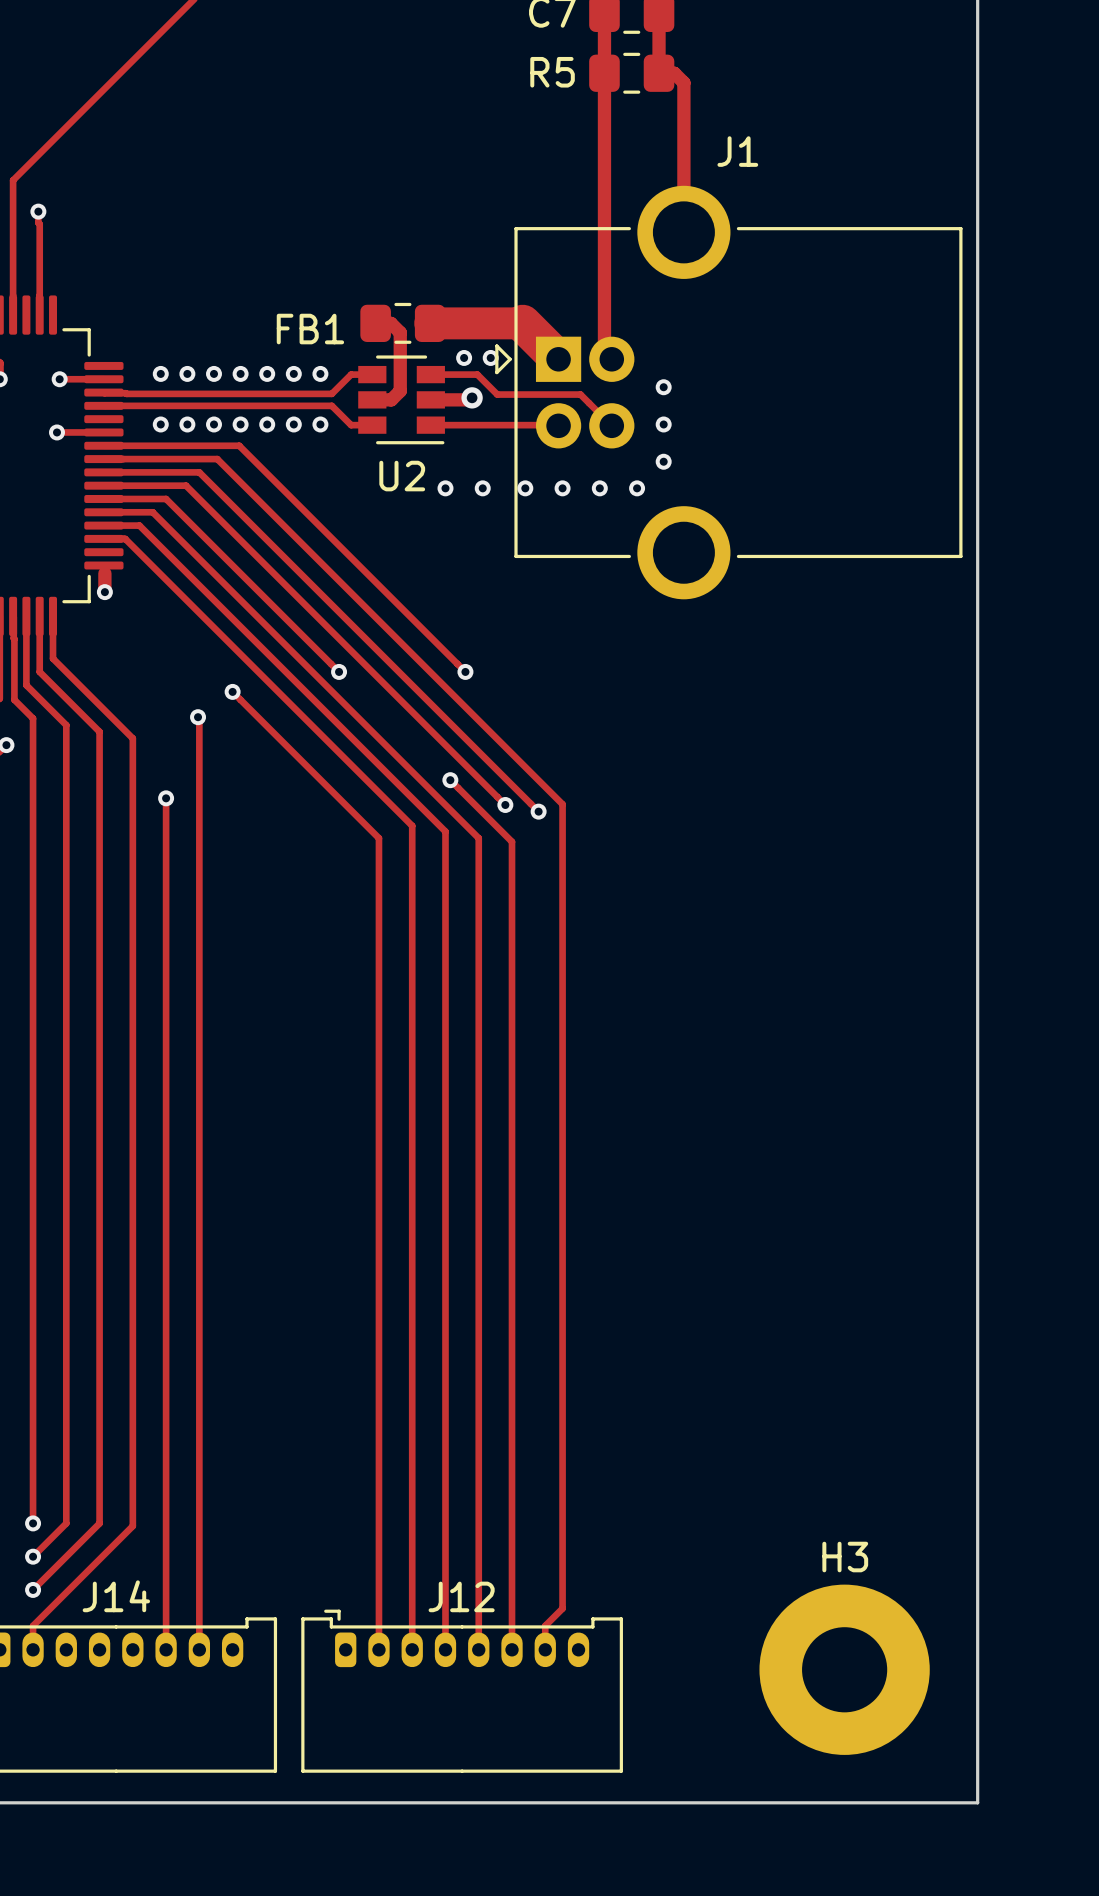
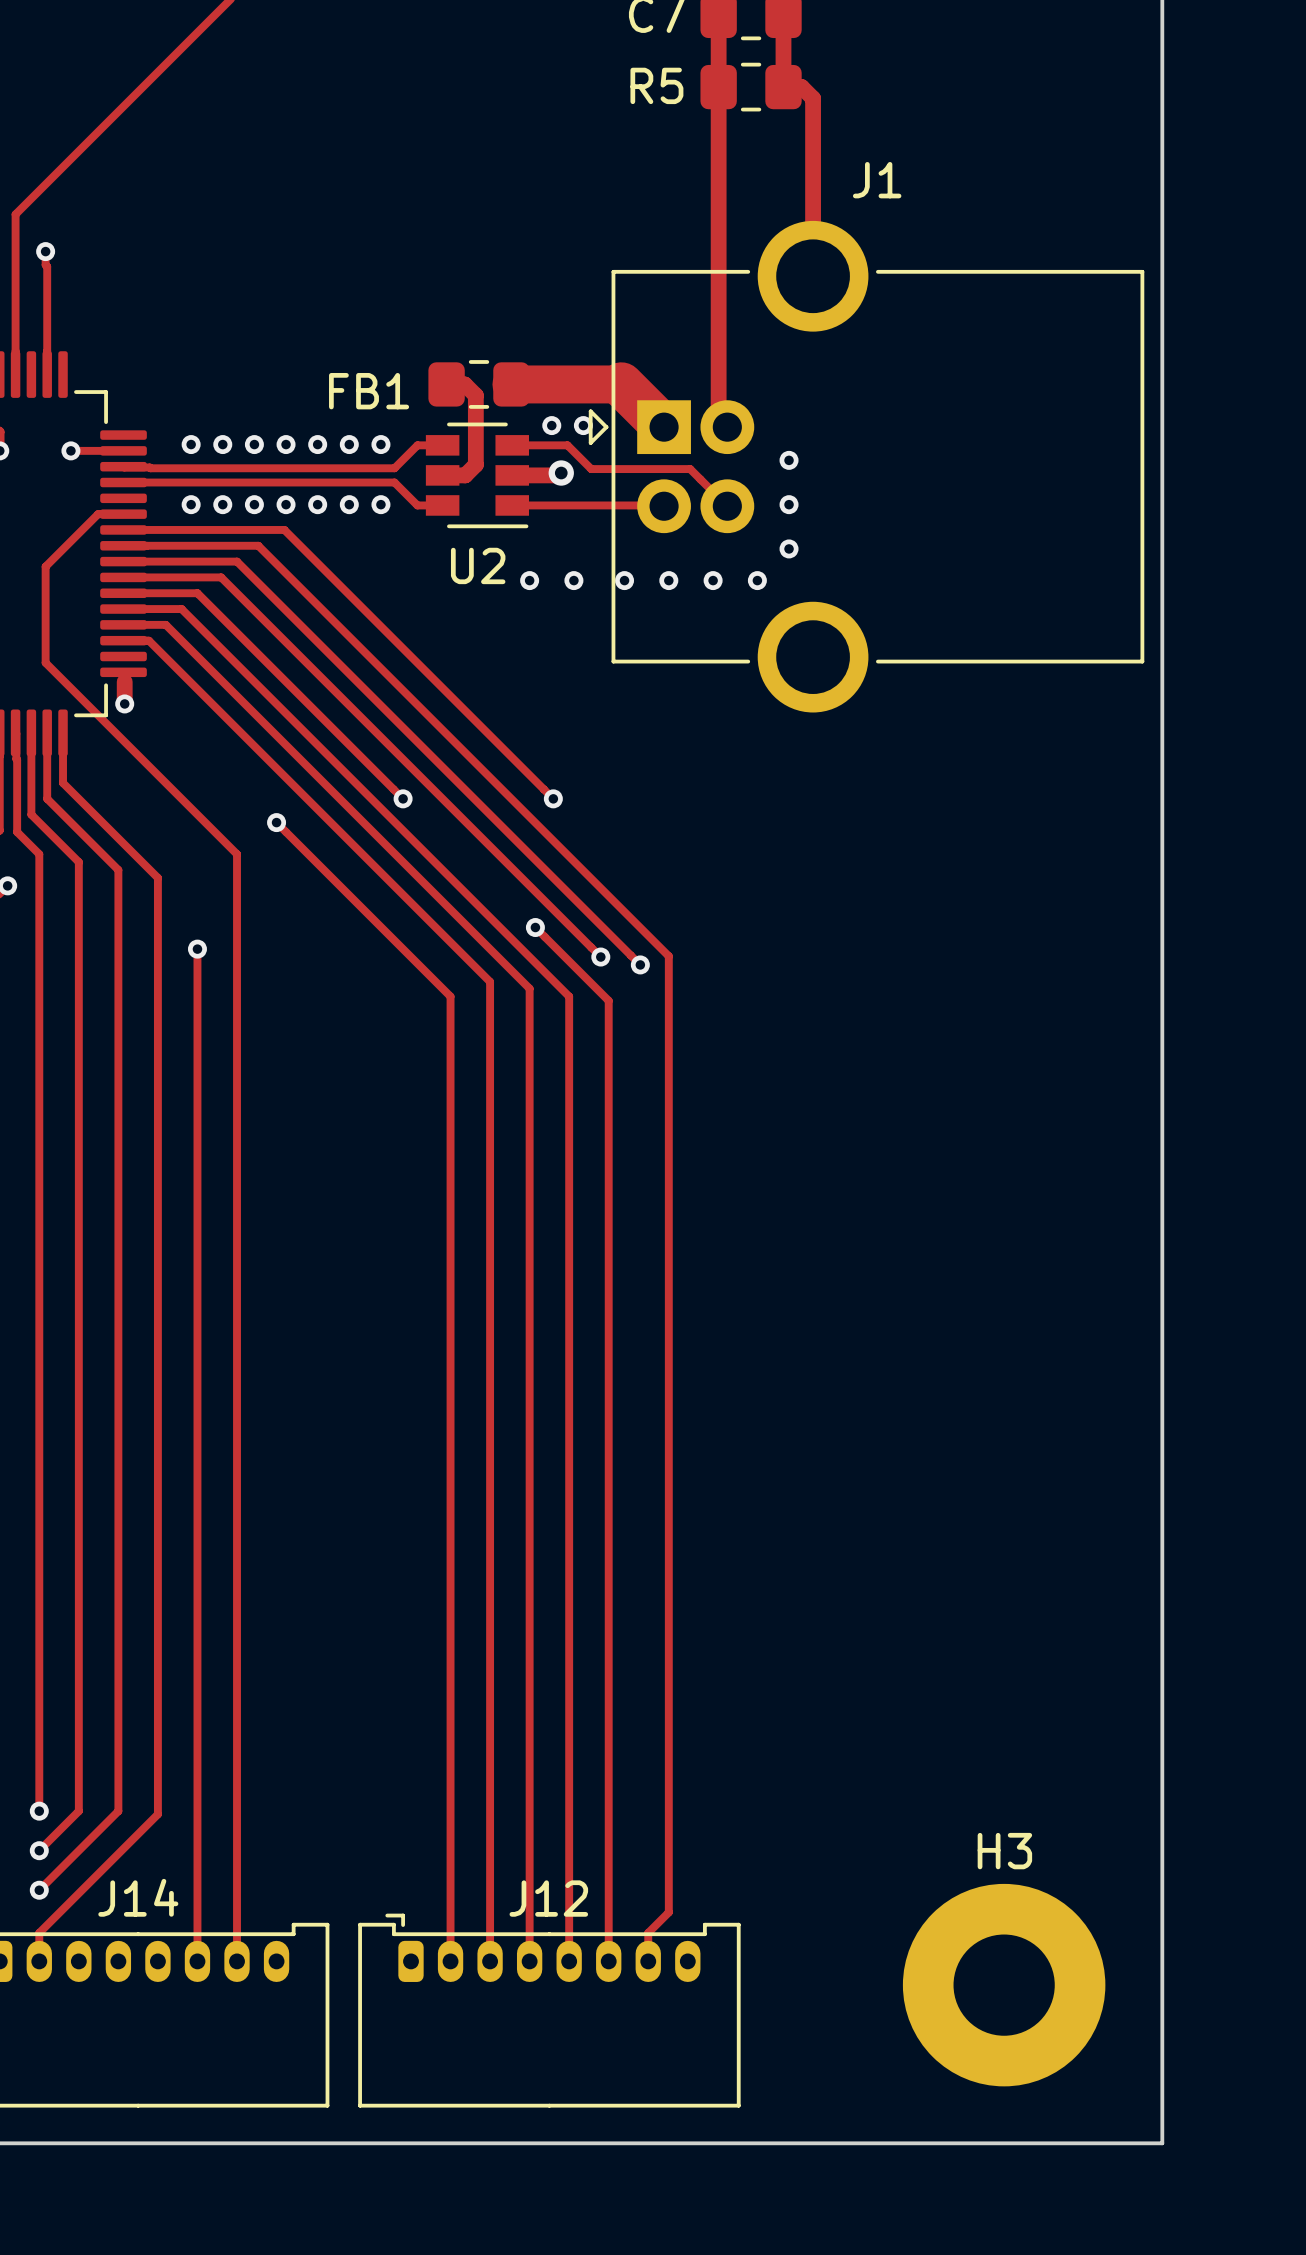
track: (57, 432) (82, 432) -> (235, 852) (45, 662) (45, 566) (98, 514)
via: (57, 432) -> none
via: (198, 717) -> none

